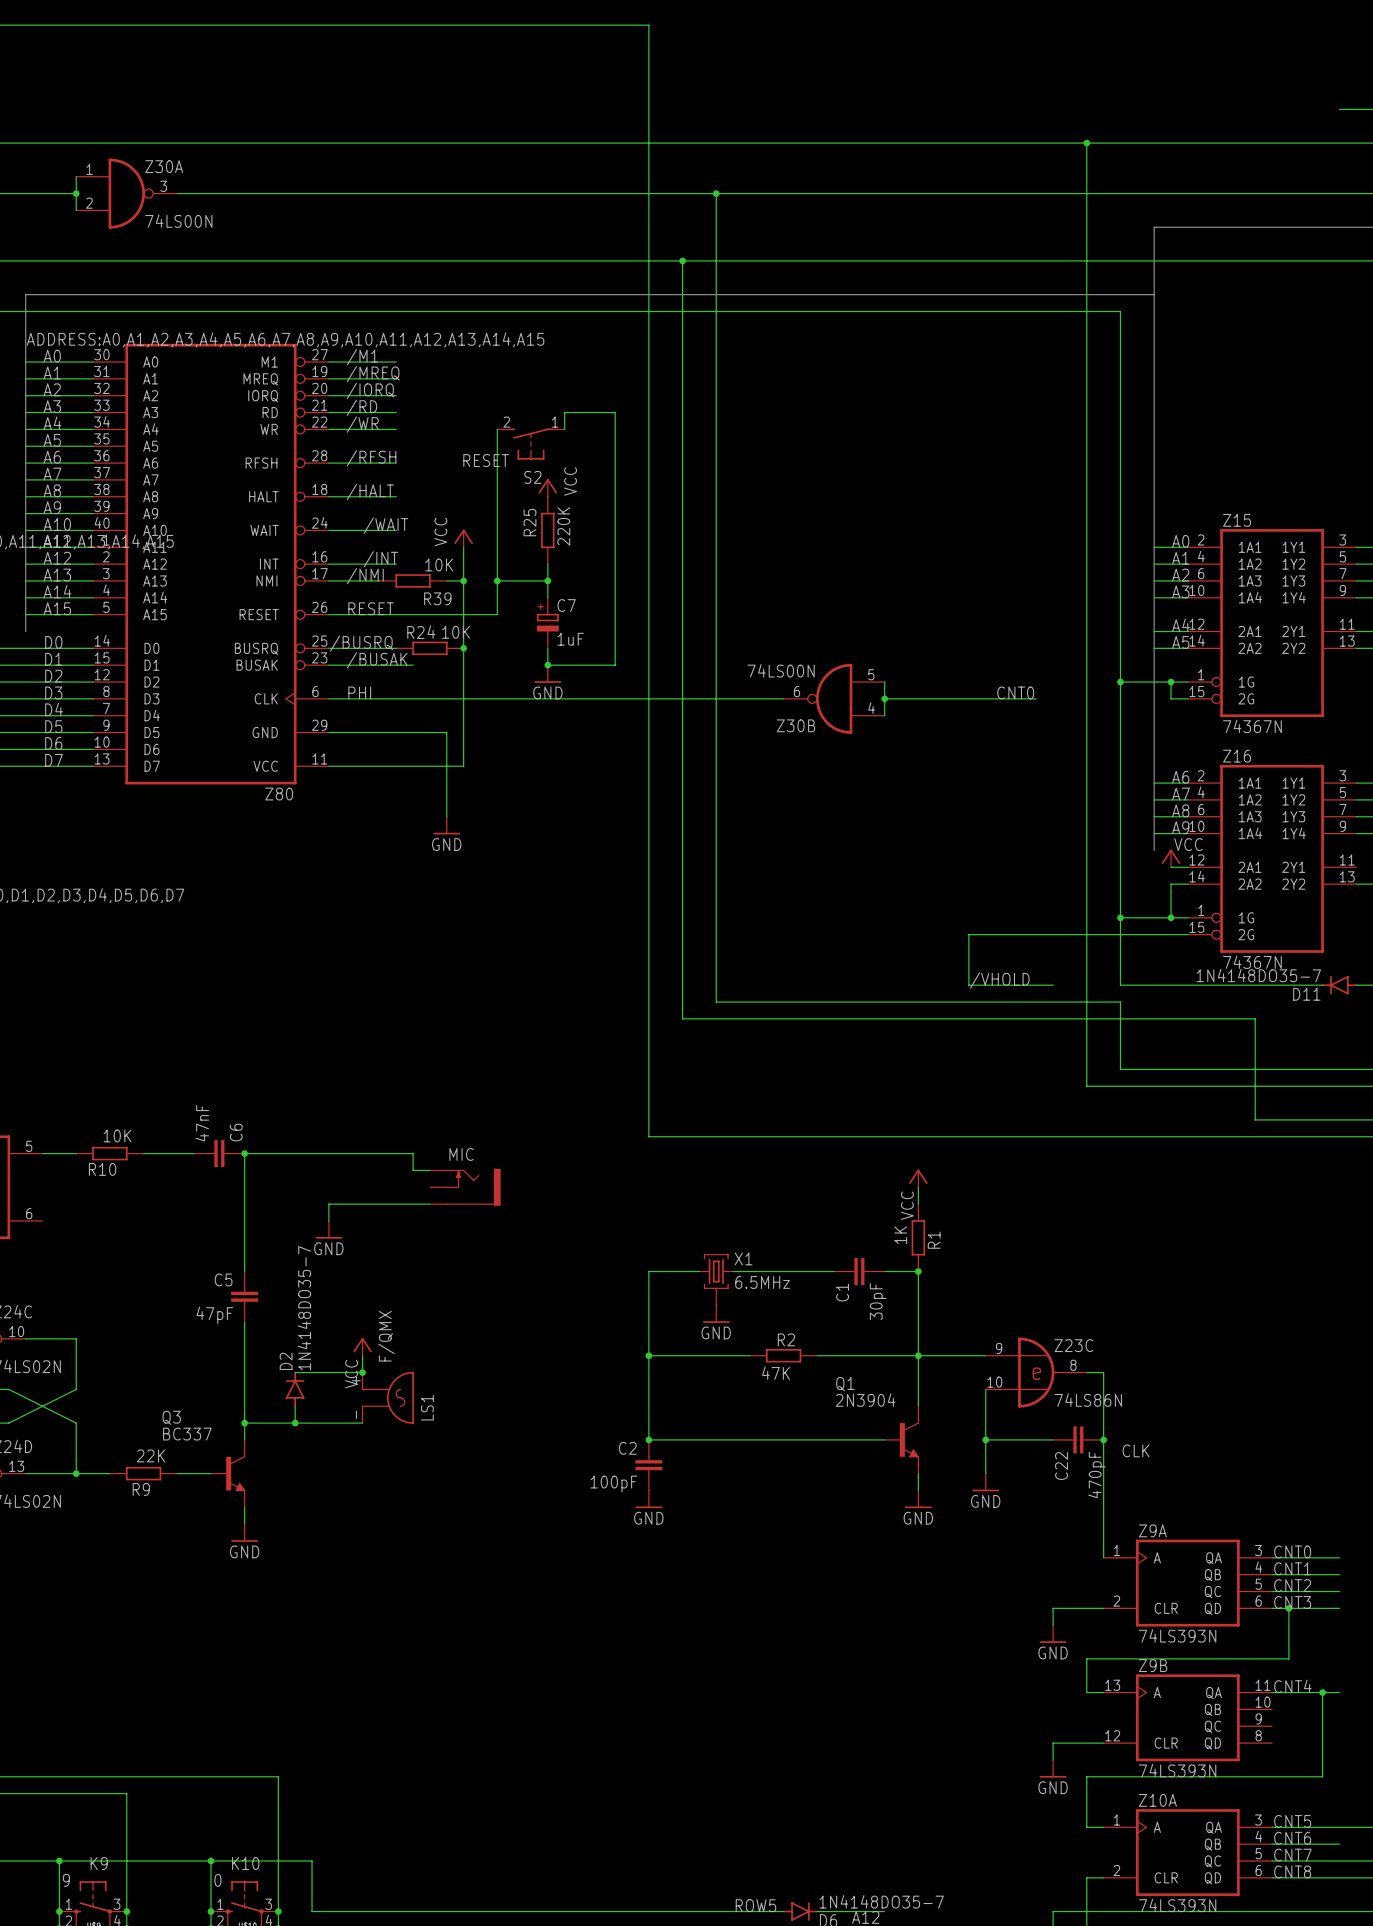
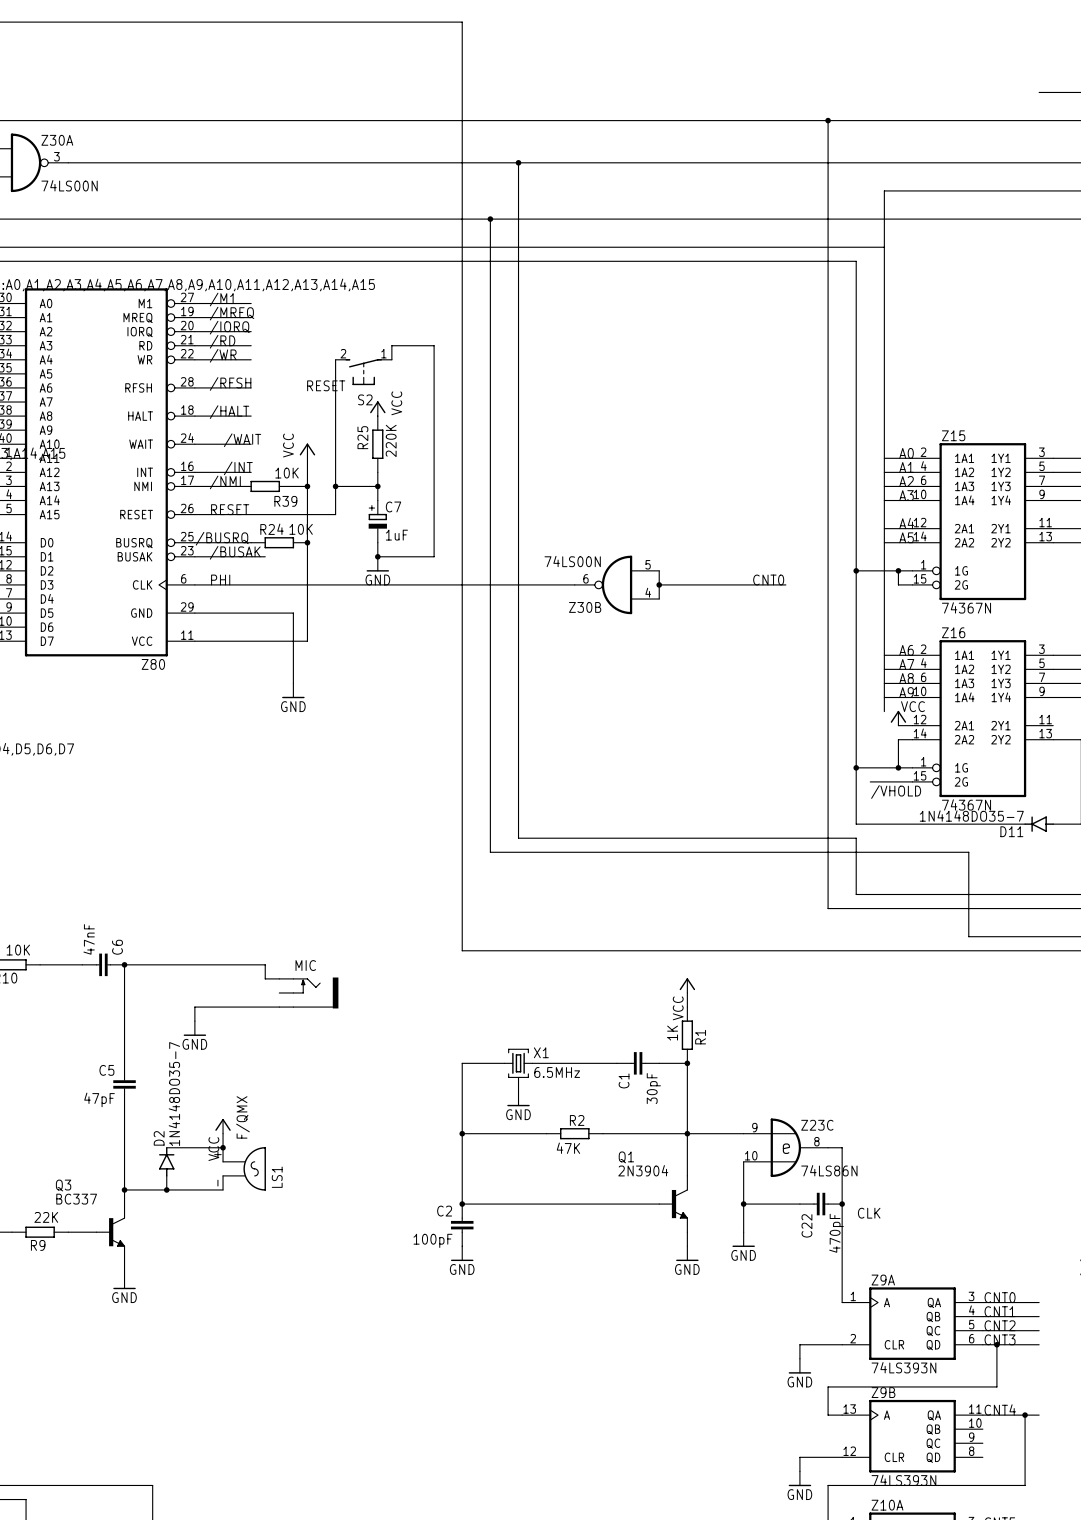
wire: (1137, 934) (968, 934) (968, 985) (1053, 985) -> none
label: none -> /VHOLD (896, 792)
label: /VHOLD (999, 980) -> none

